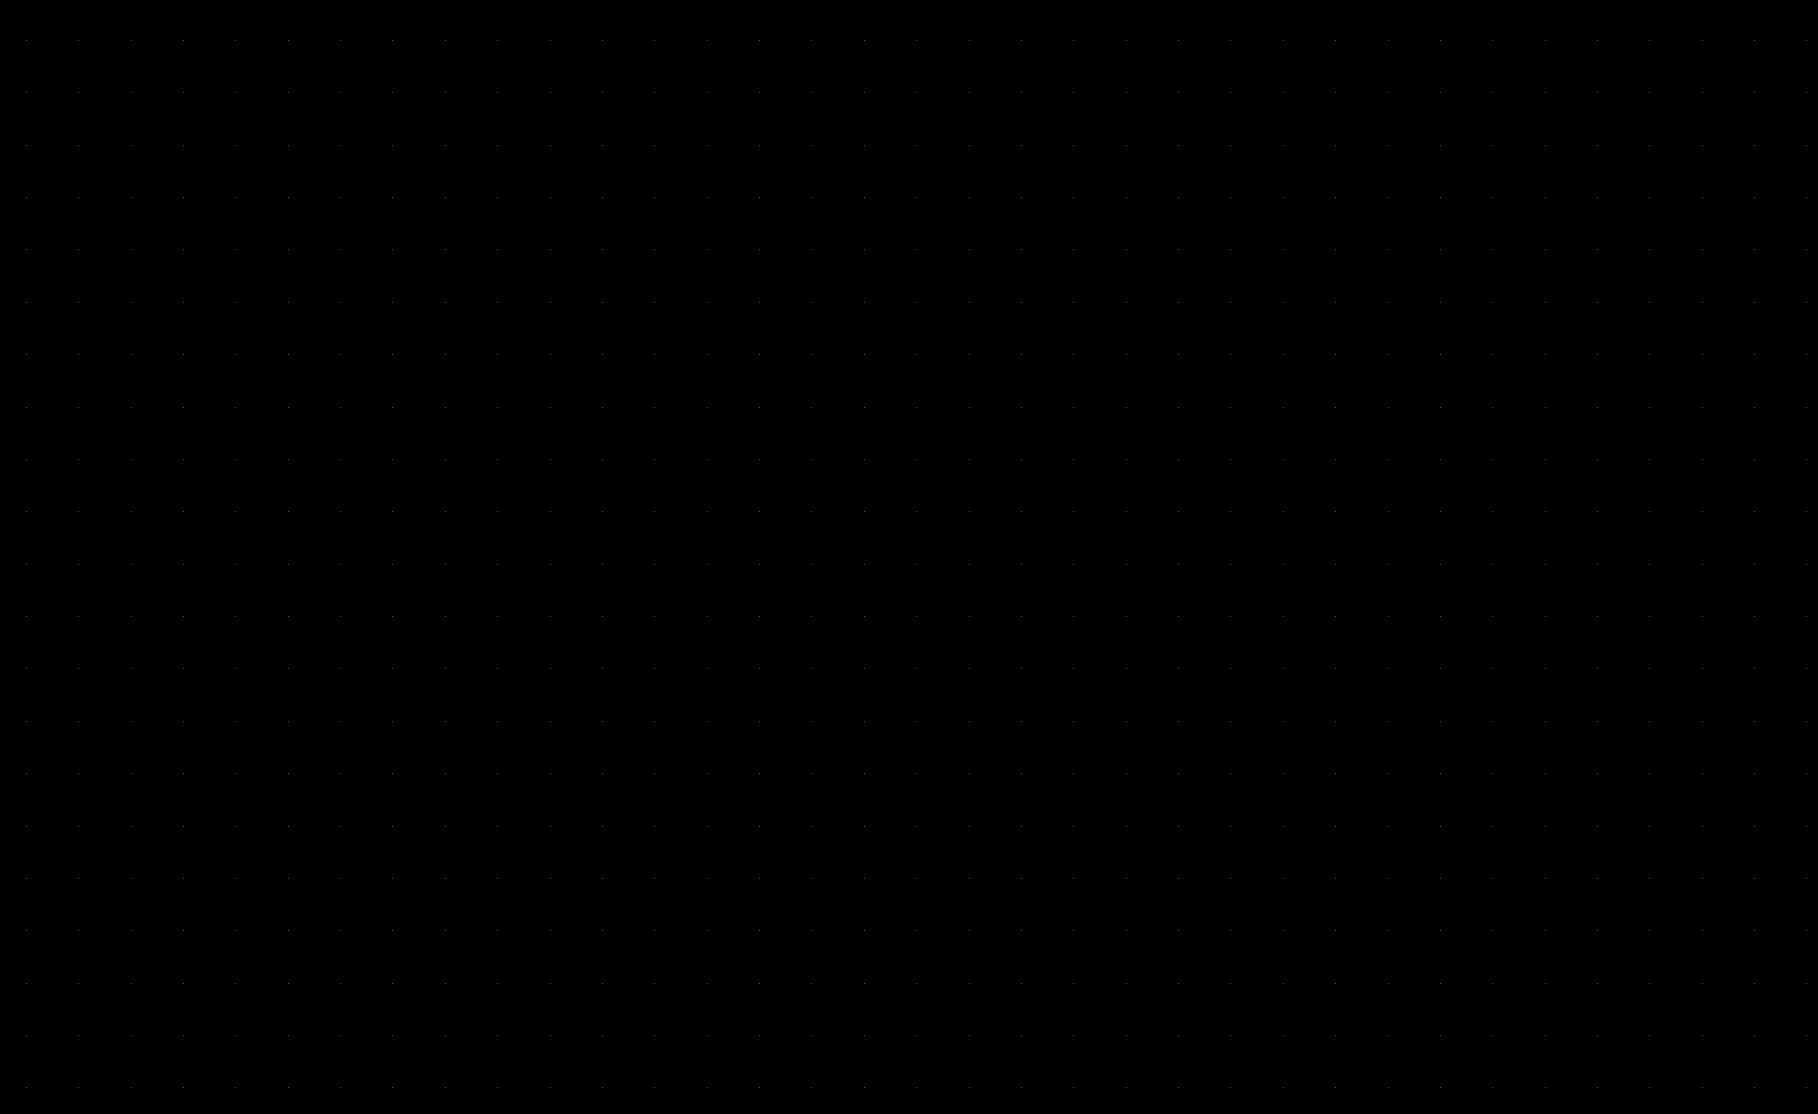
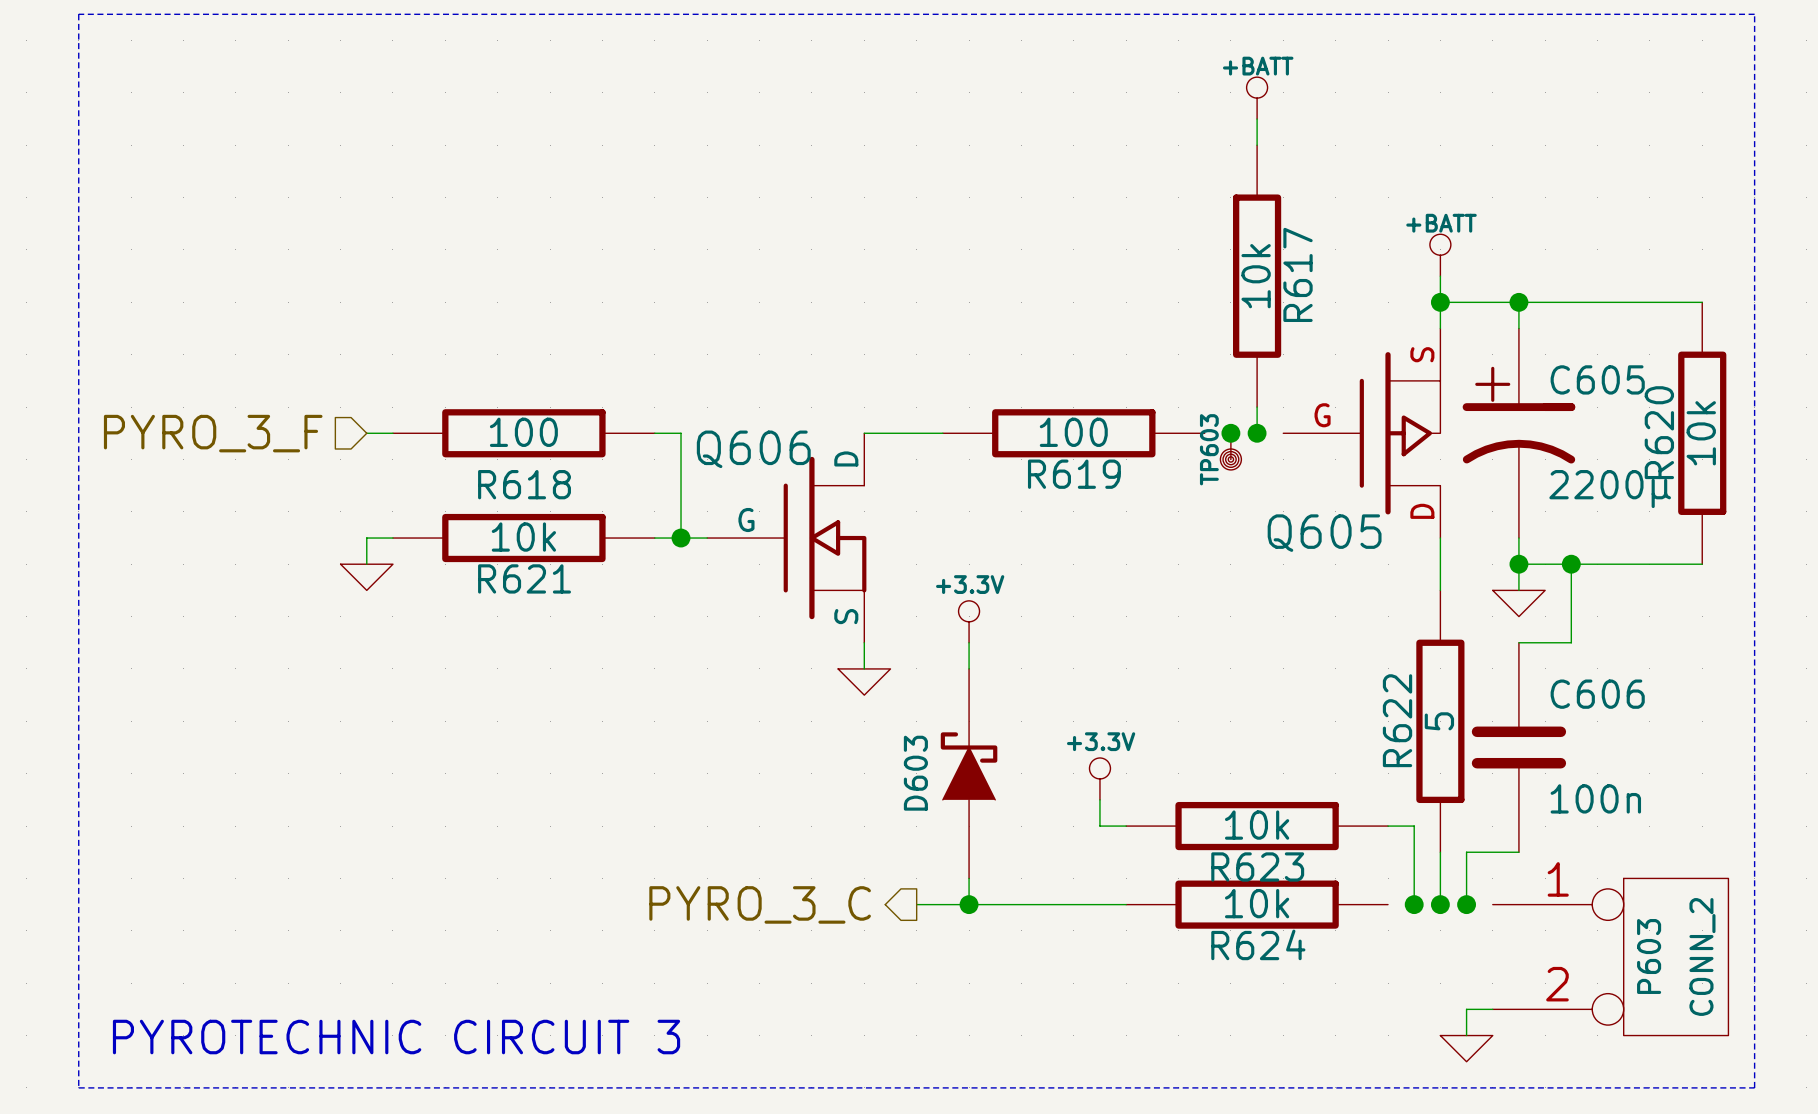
line: none -> (78, 14) (78, 1087) (1754, 1087) (1754, 14) (78, 14)
power symbol: none -> +BATT (1257, 98)
wire: none -> (1257, 119) (1257, 145)
power symbol: none -> +BATT (1440, 255)
R617: none -> 10k (1257, 276)
wire: none -> (1440, 276) (1440, 328)
wire: none -> (1440, 302) (1702, 302)
junction: none -> (1440, 302)
wire: none -> (1518, 302) (1518, 328)
junction: none -> (1518, 302)
wire: none -> (1257, 407) (1257, 433)
hierarchical label: none -> PYRO_3_F (213, 433)
wire: none -> (366, 433) (392, 433)
R618: none -> 100 (523, 433)
wire: none -> (654, 433) (681, 433) (681, 538)
wire: none -> (864, 433) (942, 433)
R619: none -> 100 (1073, 433)
junction: none -> (1230, 433)
junction: none -> (1257, 433)
Q605: none -> (1361, 433)
C605: none -> 2200µ (1518, 433)
R620: none -> 10k (1702, 433)
TP603: none -> (1230, 451)
wire: none -> (392, 538) (366, 538) (366, 564)
R621: none -> 10k (523, 538)
wire: none -> (654, 538) (707, 538)
junction: none -> (681, 538)
Q606: none -> (786, 538)
wire: none -> (1440, 538) (1440, 590)
wire: none -> (1518, 538) (1518, 590)
wire: none -> (1518, 564) (1702, 564)
junction: none -> (1518, 564)
wire: none -> (1571, 564) (1571, 642) (1518, 642)
junction: none -> (1571, 564)
power symbol: none -> (366, 577)
power symbol: none -> (1518, 603)
power symbol: none -> +3.3V (969, 621)
wire: none -> (864, 642) (864, 668)
wire: none -> (969, 642) (969, 668)
power symbol: none -> (864, 682)
R622: none -> 5 (1440, 721)
C606: none -> 100n (1518, 747)
D603: none -> (969, 773)
power symbol: none -> +3.3V (1099, 778)
wire: none -> (1099, 799) (1099, 826) (1126, 826)
R623: none -> 10k (1257, 826)
wire: none -> (1388, 826) (1414, 826) (1414, 904)
wire: none -> (1440, 852) (1440, 904)
wire: none -> (1518, 852) (1466, 852) (1466, 904)
wire: none -> (969, 878) (969, 904)
hierarchical label: none -> PYRO_3_C (760, 904)
wire: none -> (916, 904) (1126, 904)
junction: none -> (969, 904)
R624: none -> 10k (1257, 904)
junction: none -> (1414, 904)
junction: none -> (1440, 904)
junction: none -> (1466, 904)
P603: none -> CONN_2 (1610, 956)
wire: none -> (1492, 1009) (1466, 1009) (1466, 1035)
text: none -> PYROTECHNIC CIRCUIT 3 (396, 1037)
power symbol: none -> (1466, 1048)

